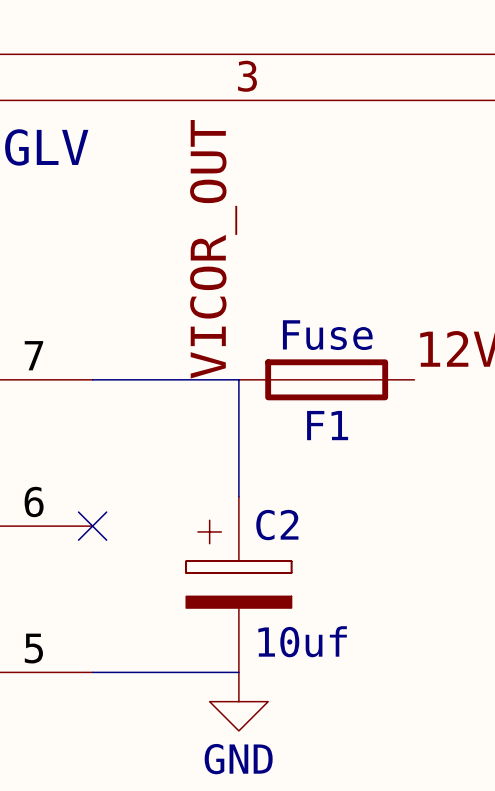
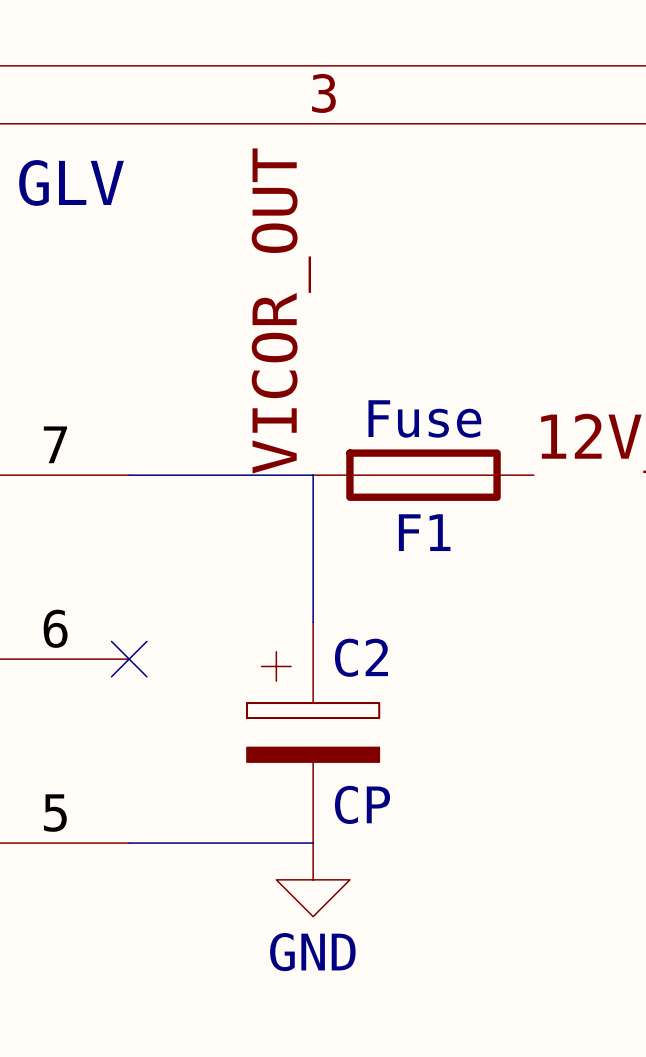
C2 value: 10uf (302, 641) -> CP (362, 804)

